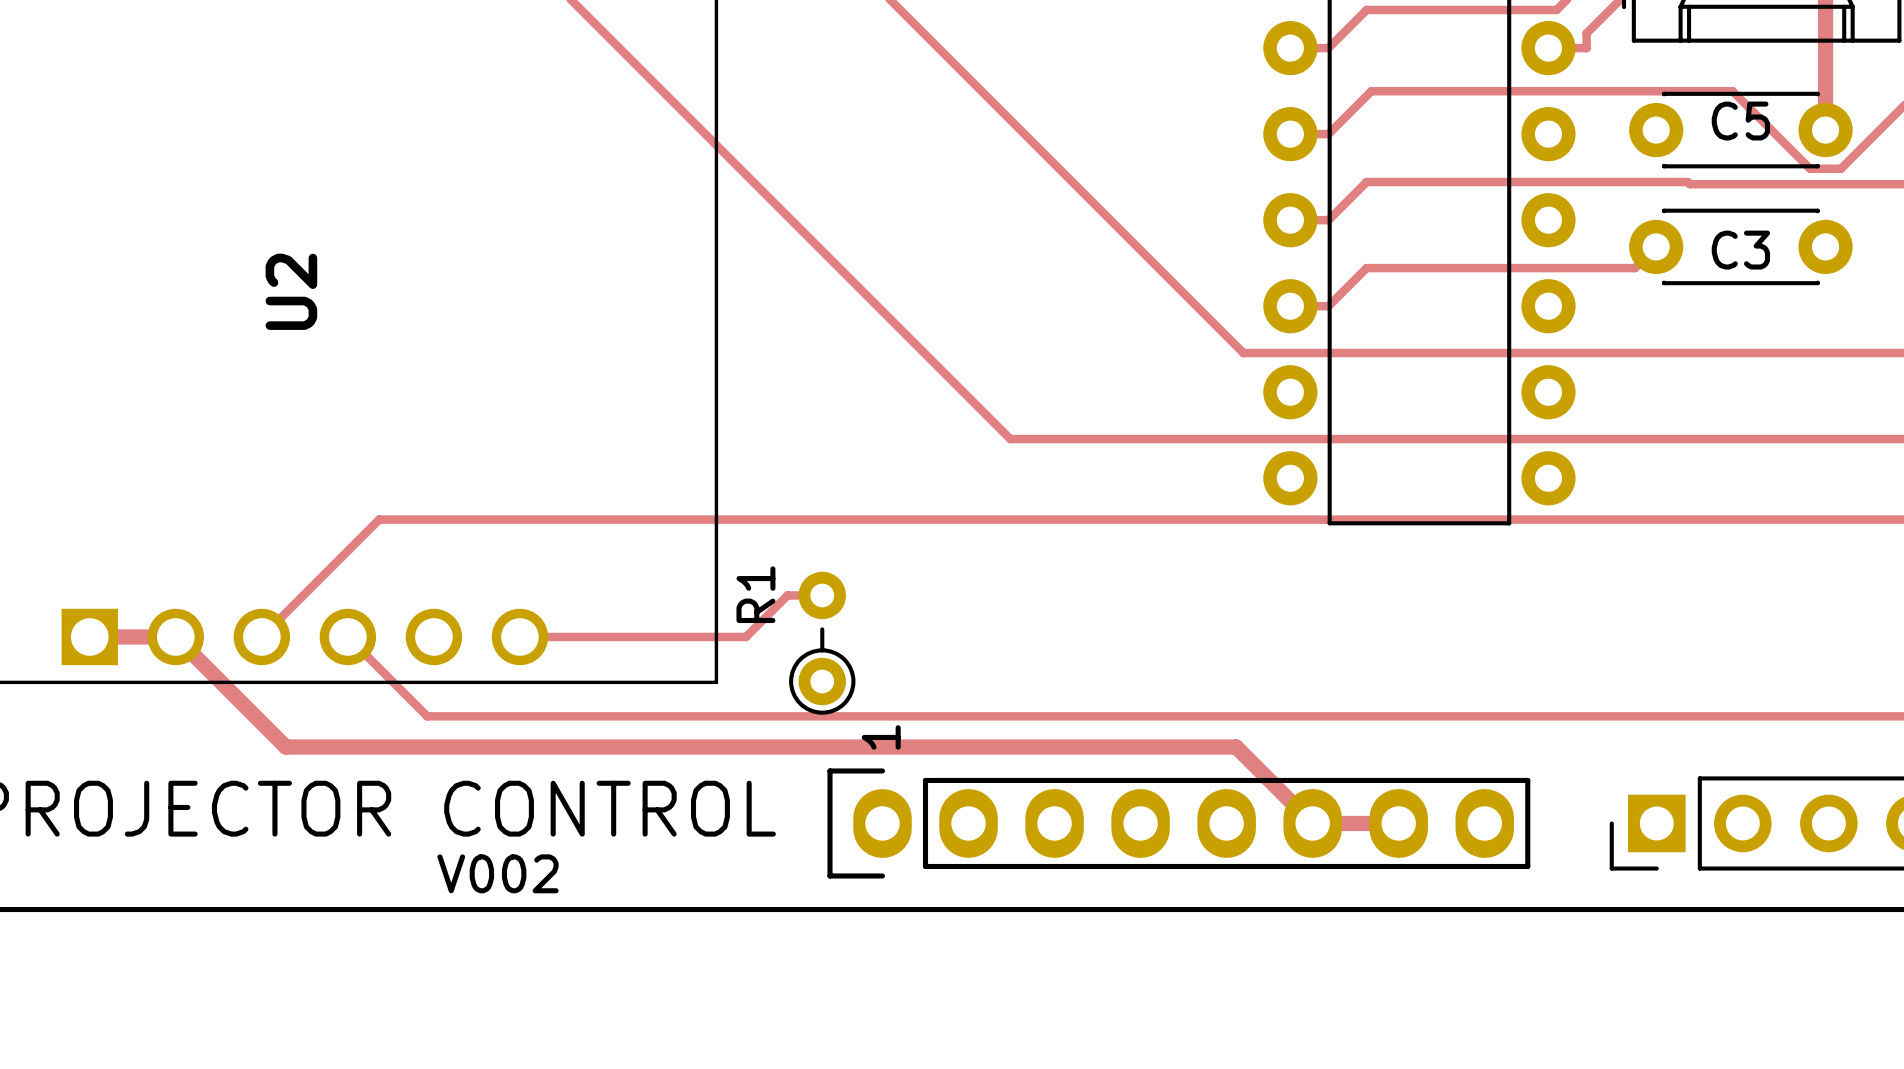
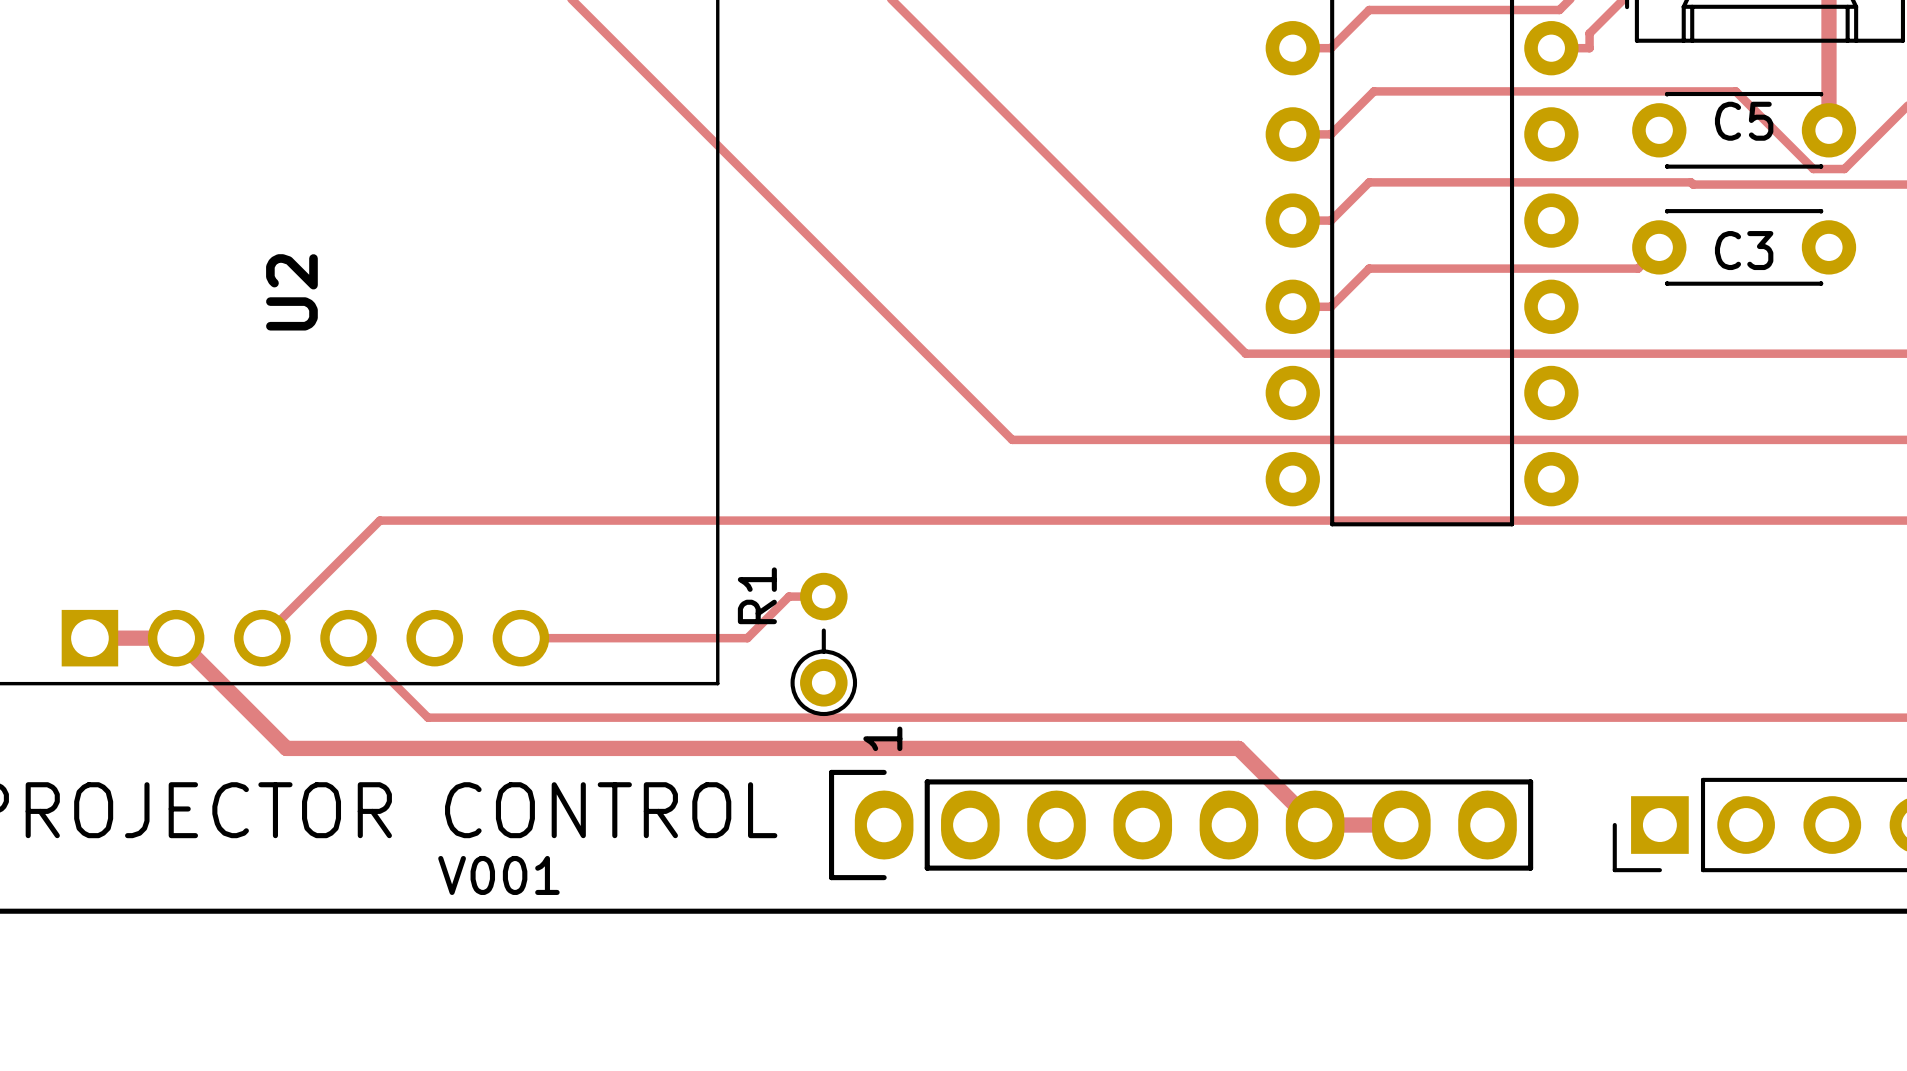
text: V002 (498, 873) -> V001 (498, 875)

